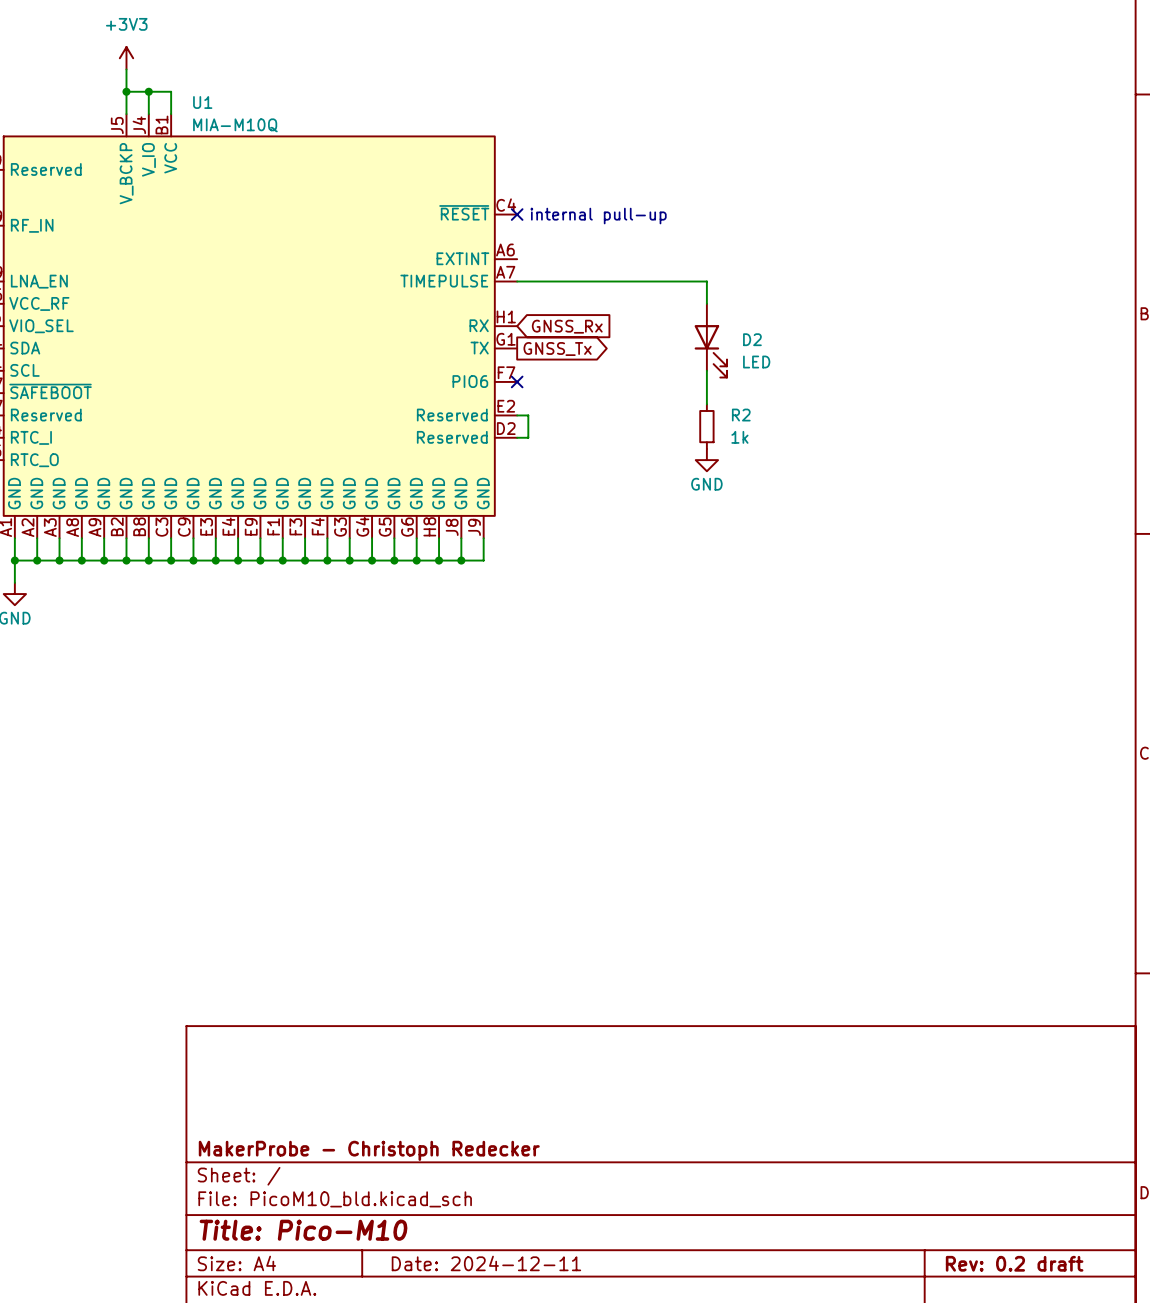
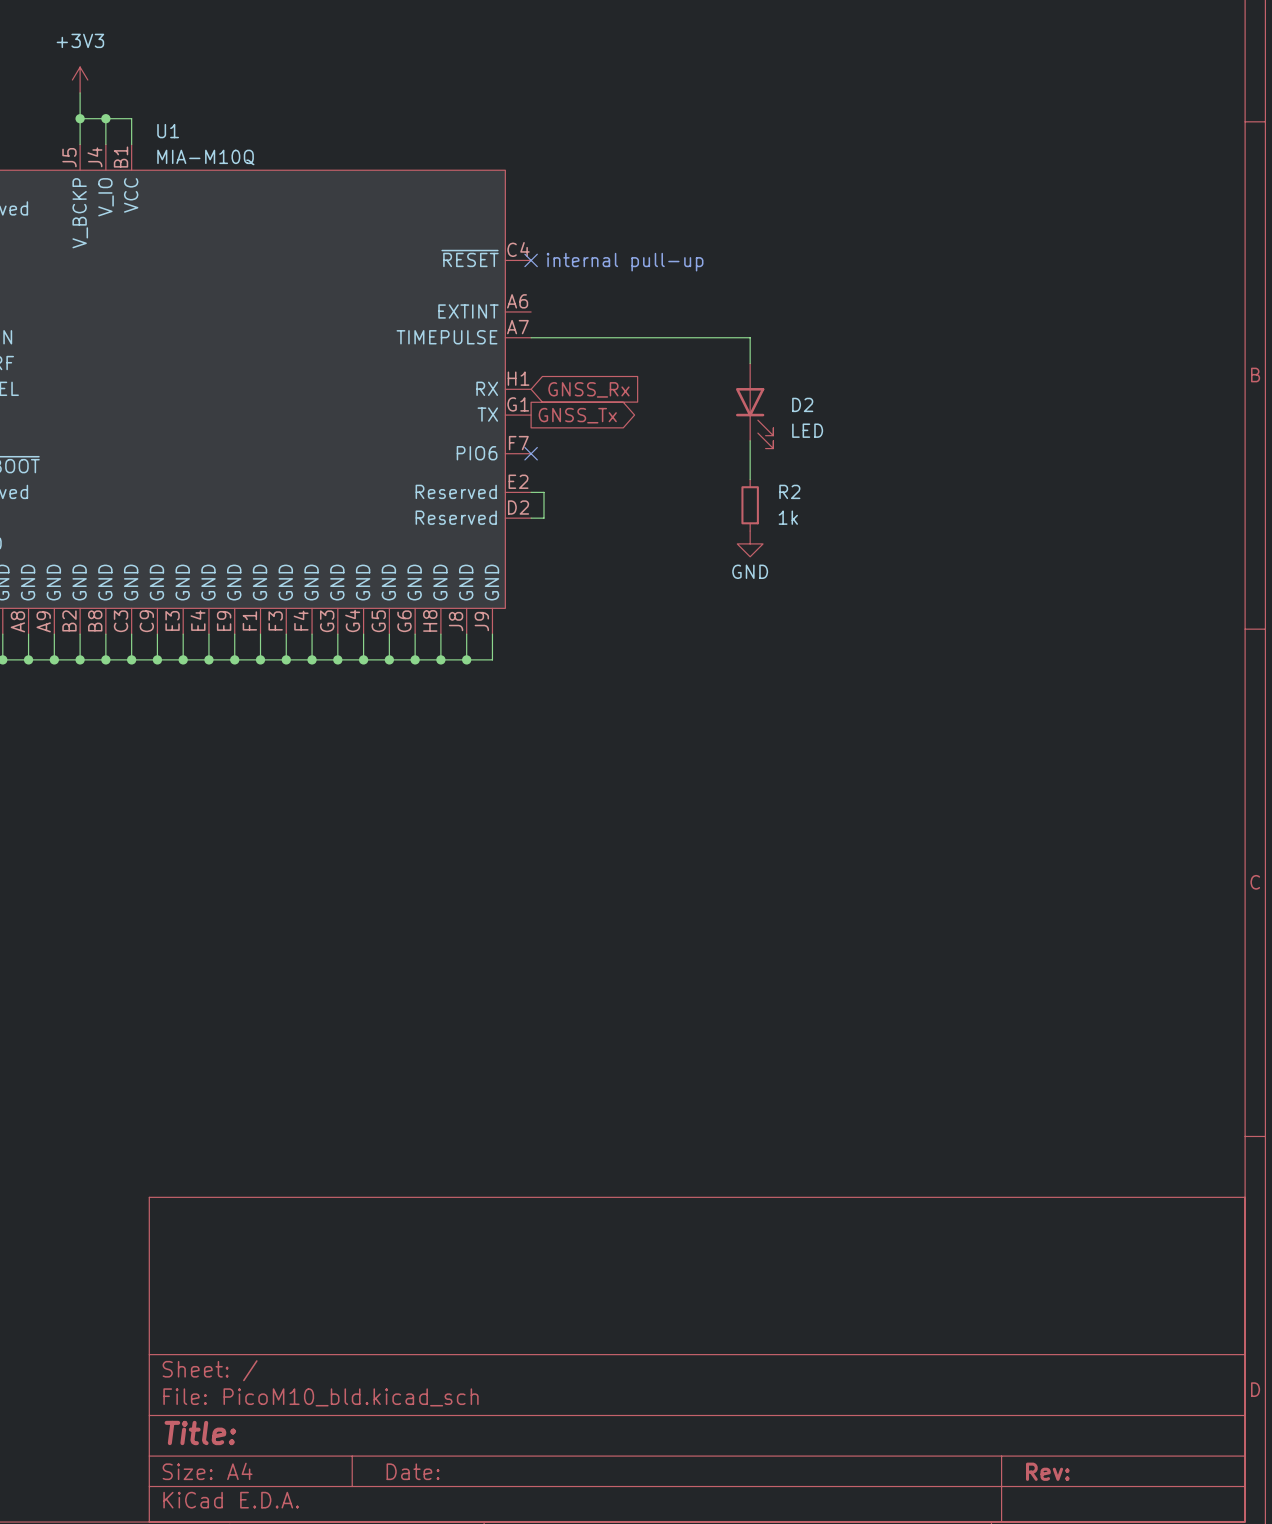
title block: MakerProbe - Christoph Redecker (369, 1150) -> none
title block: Title: Pico-M10 (303, 1230) -> Title: (200, 1432)
title block: Date: 2024-12-11 (486, 1263) -> Date: (413, 1471)
title block: Rev: 0.2 draft (1014, 1263) -> Rev: (1047, 1471)

